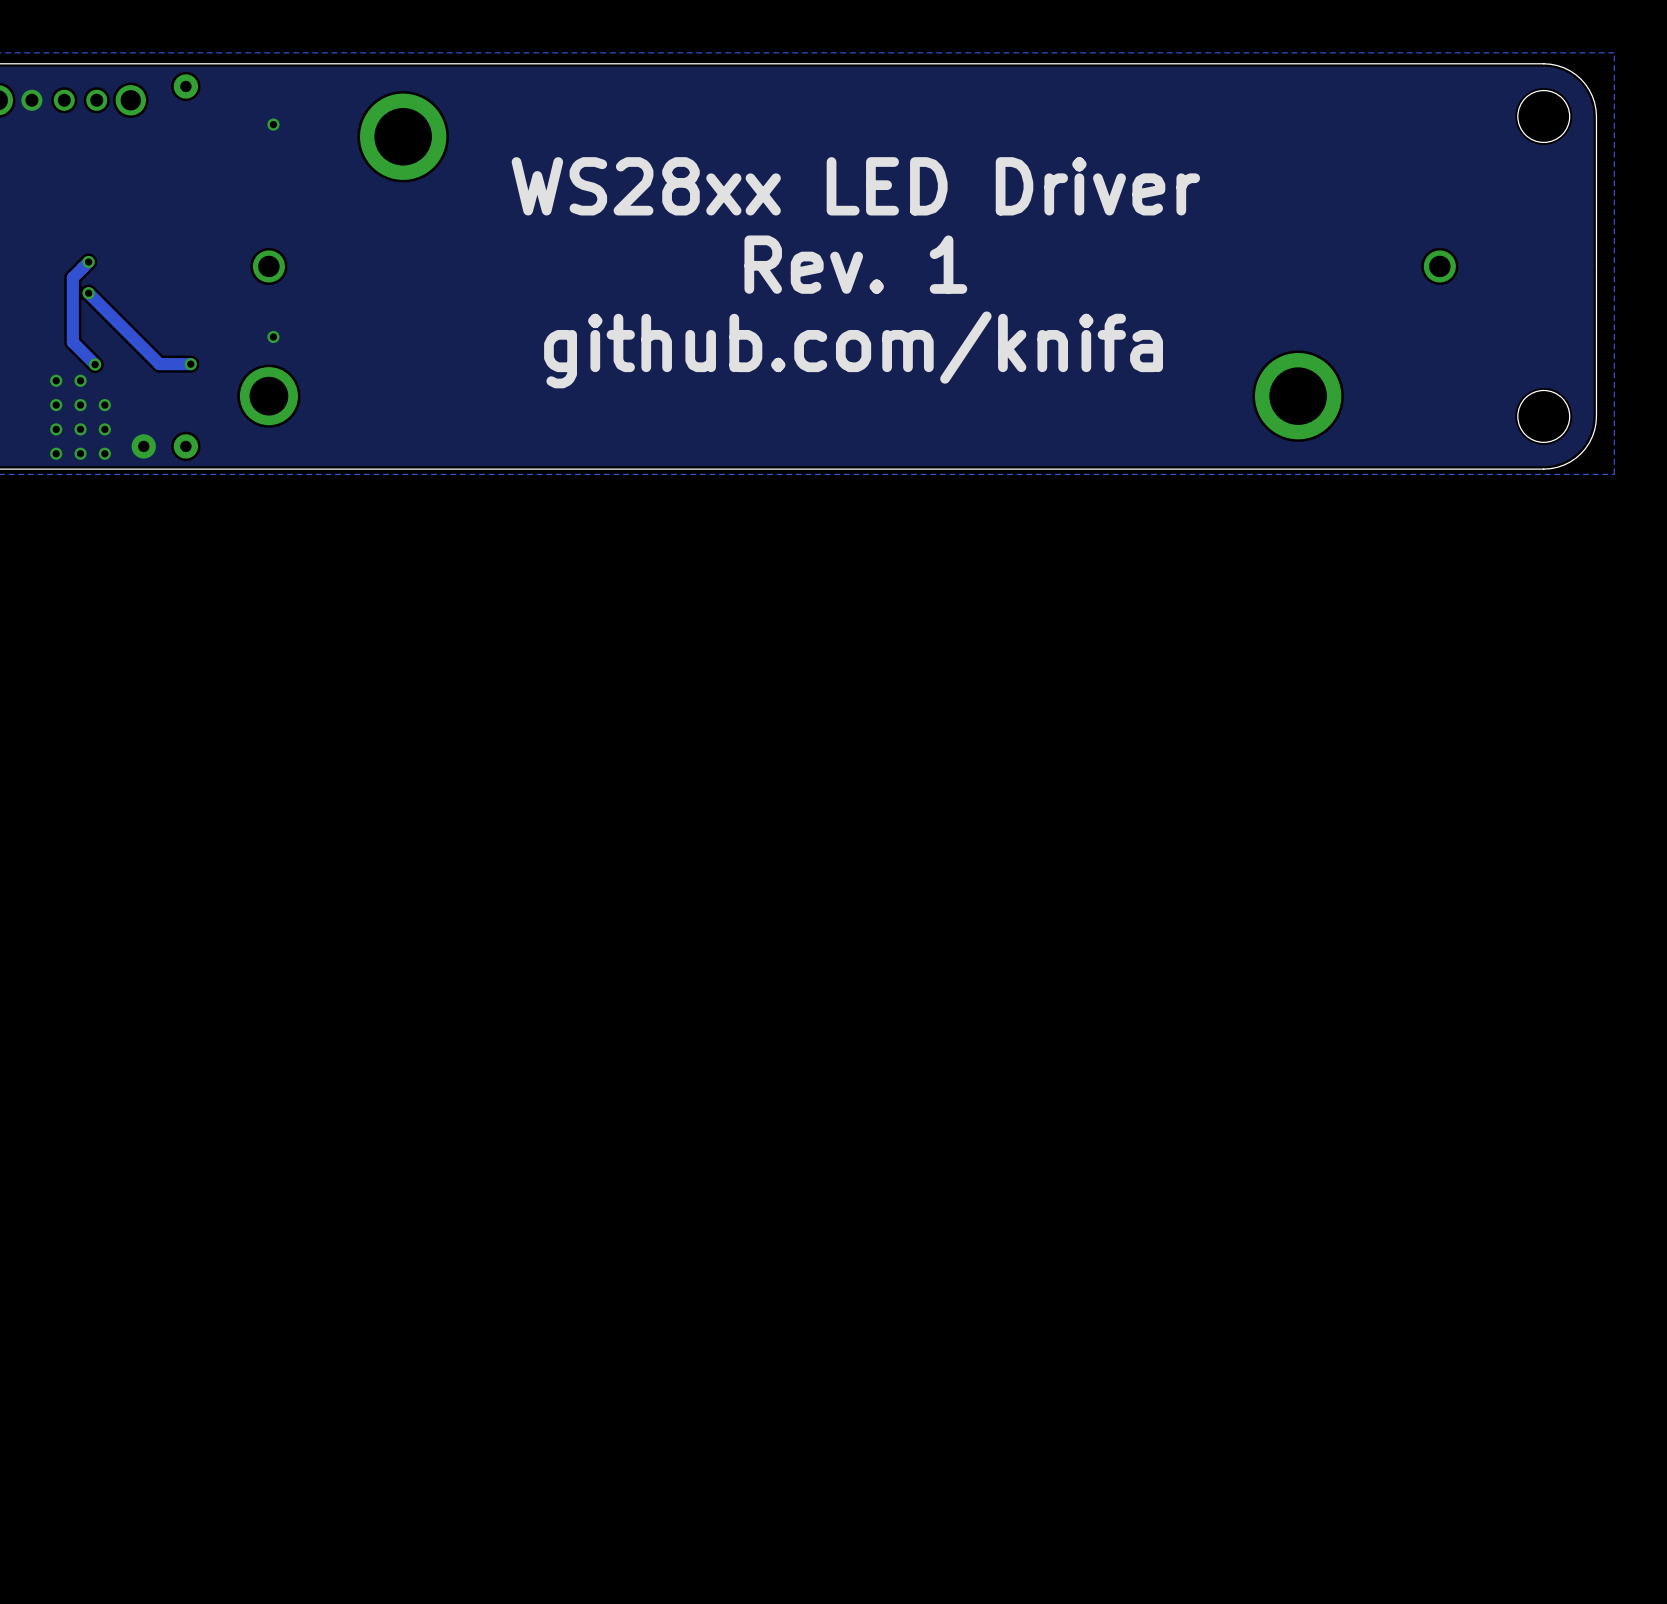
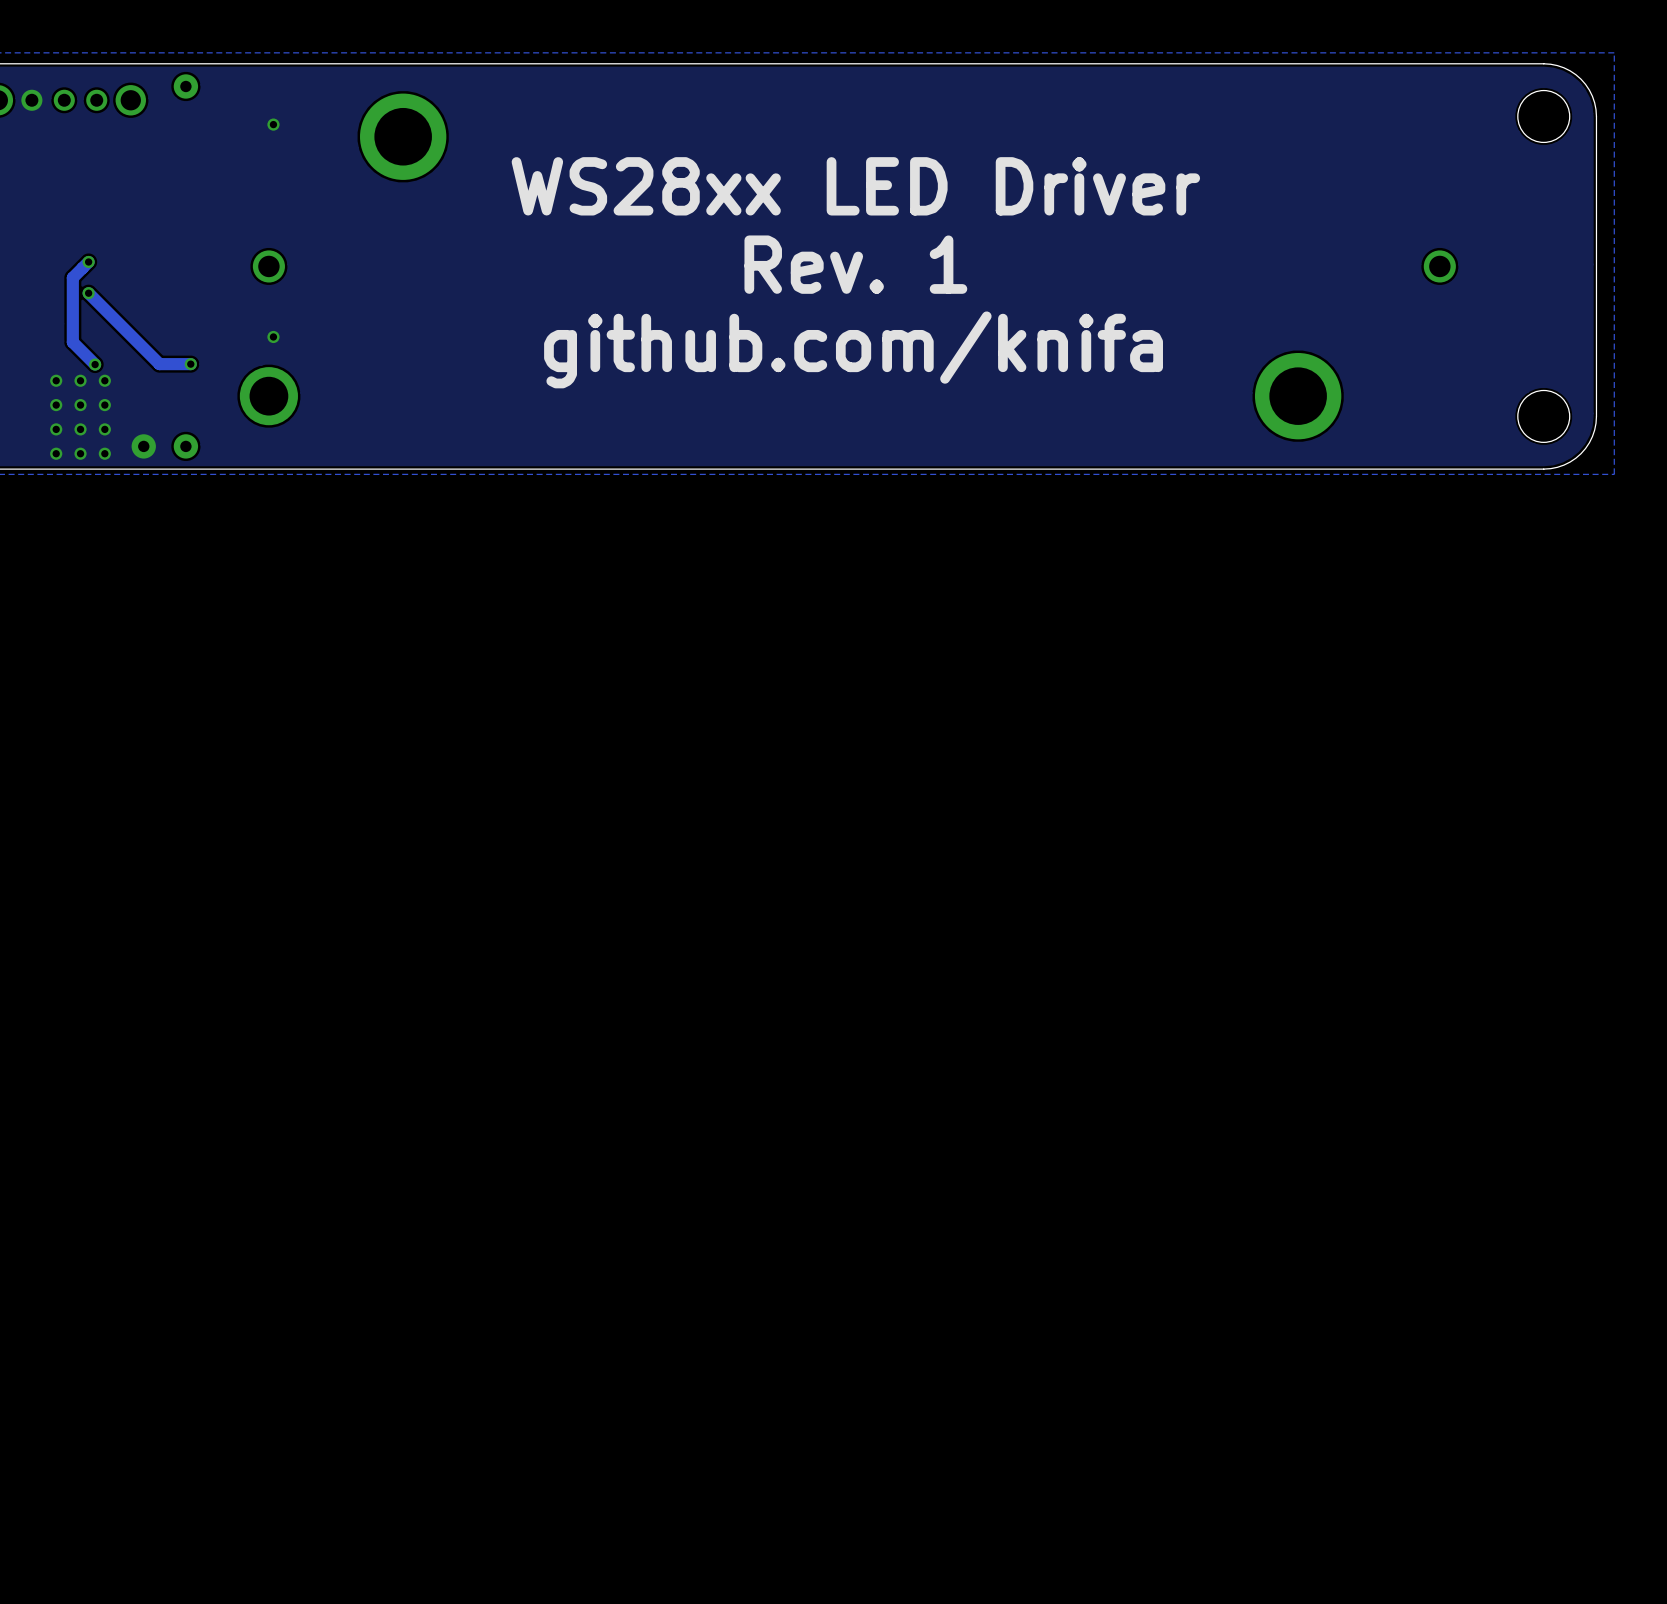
via: none -> (104, 380)

